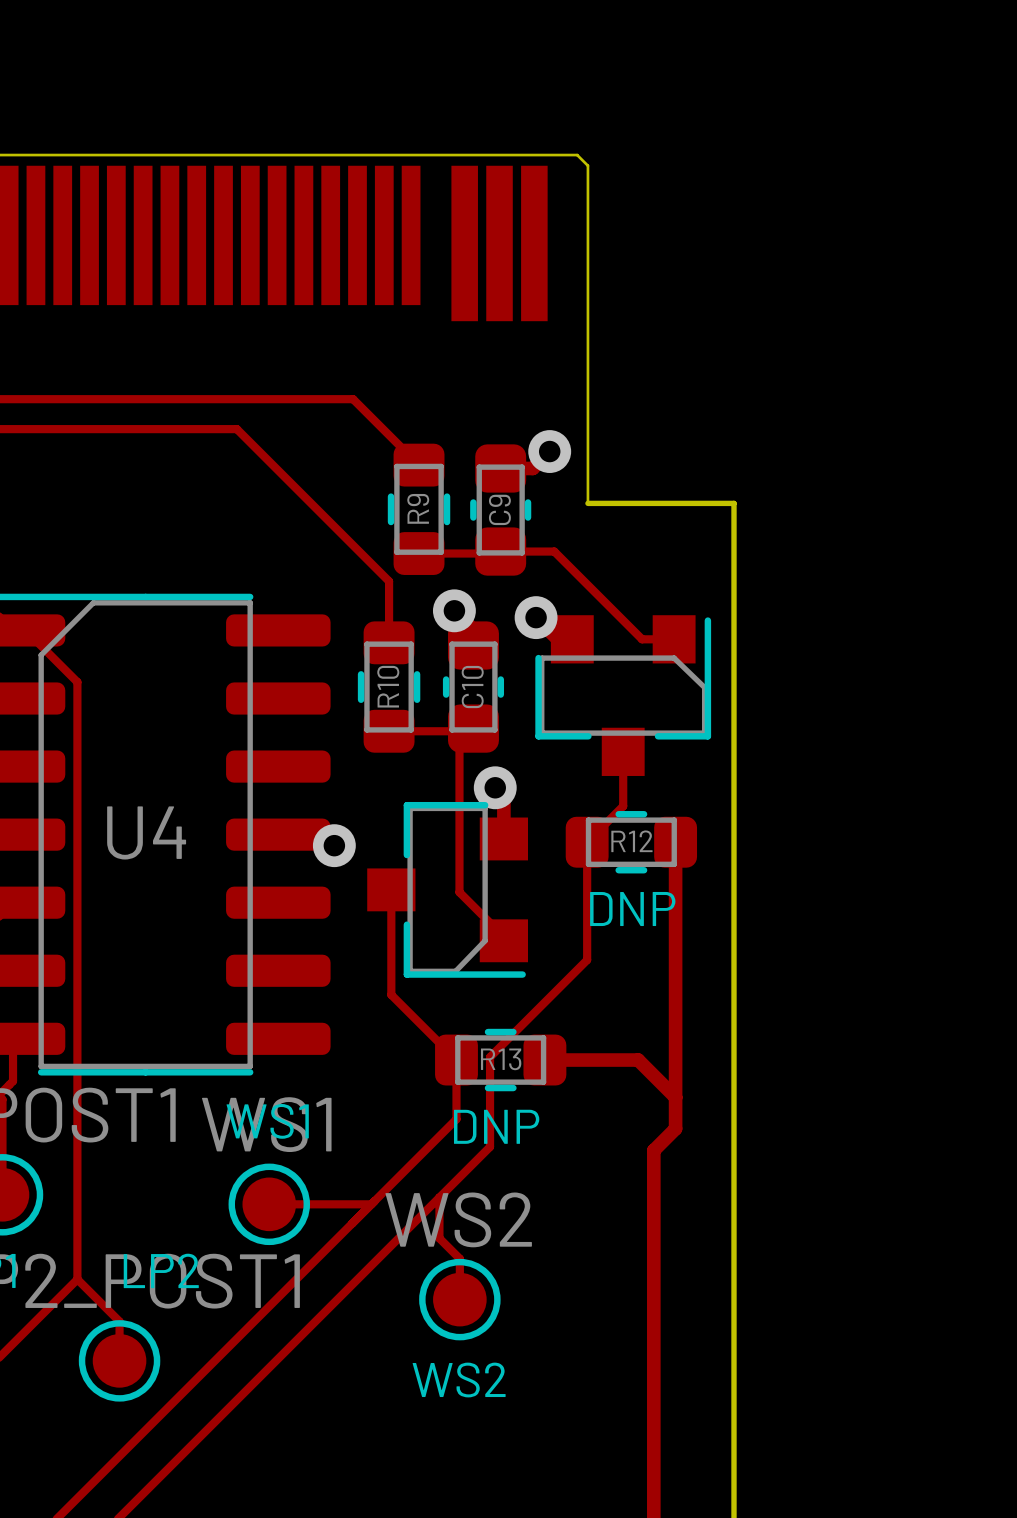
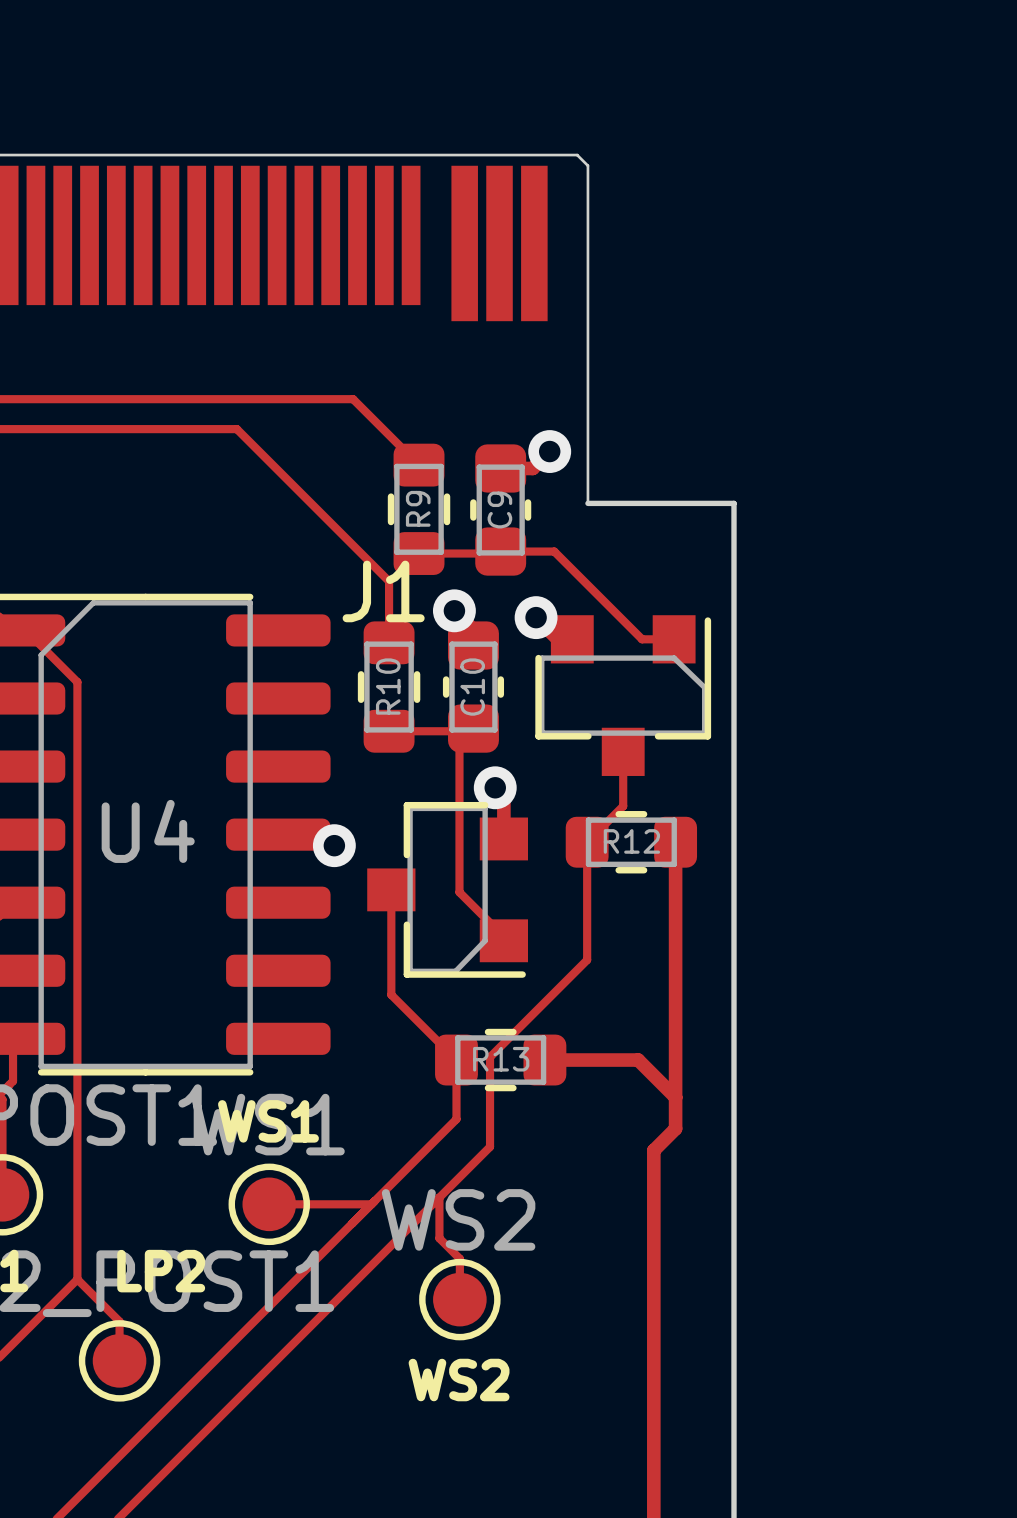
J1 name: none -> J1 (383, 591)
text: DNP (632, 908) -> none
text: DNP (496, 1126) -> none

